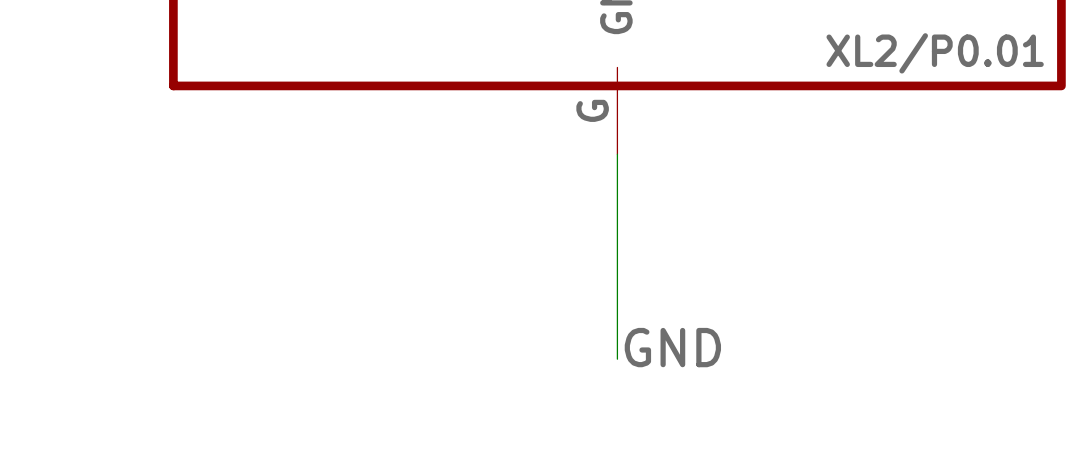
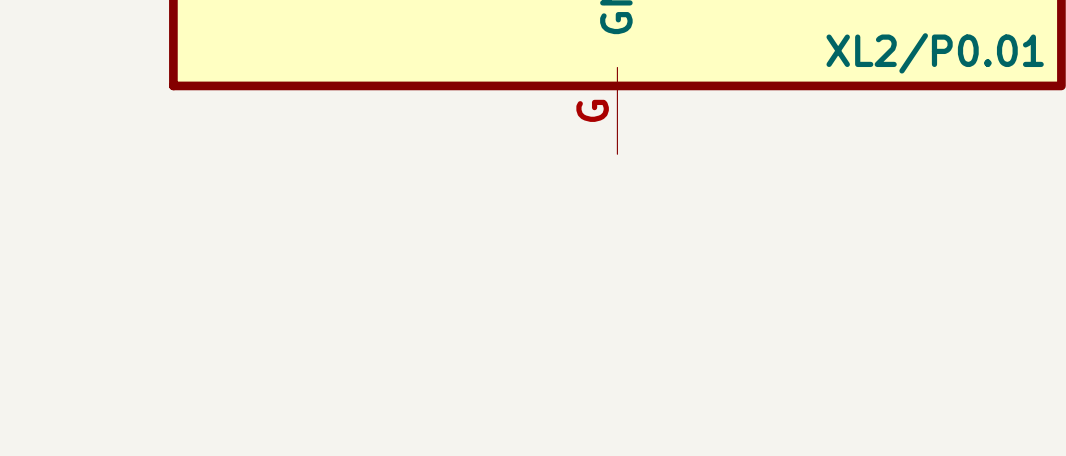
wire: (617, 154) (617, 359) -> none
label: GND (672, 347) -> none

